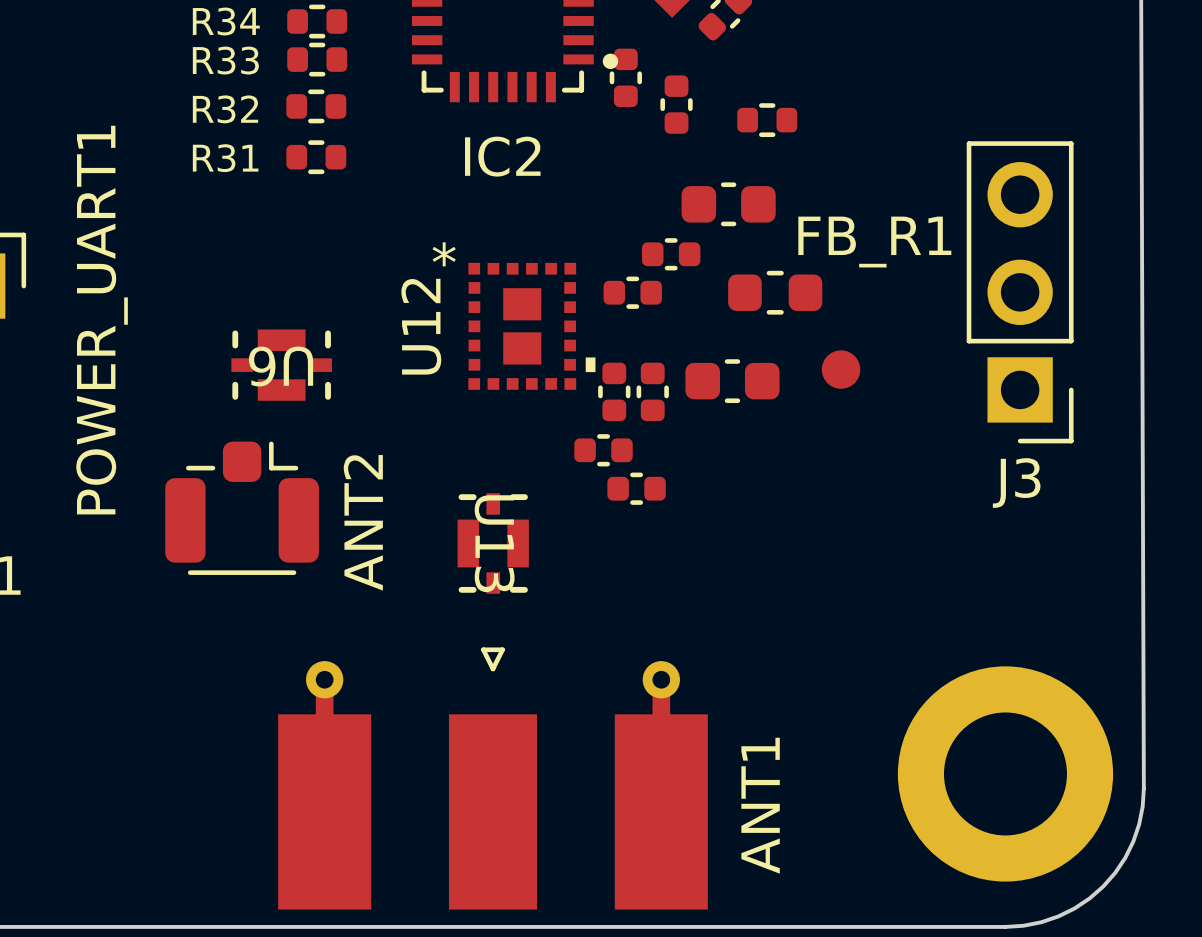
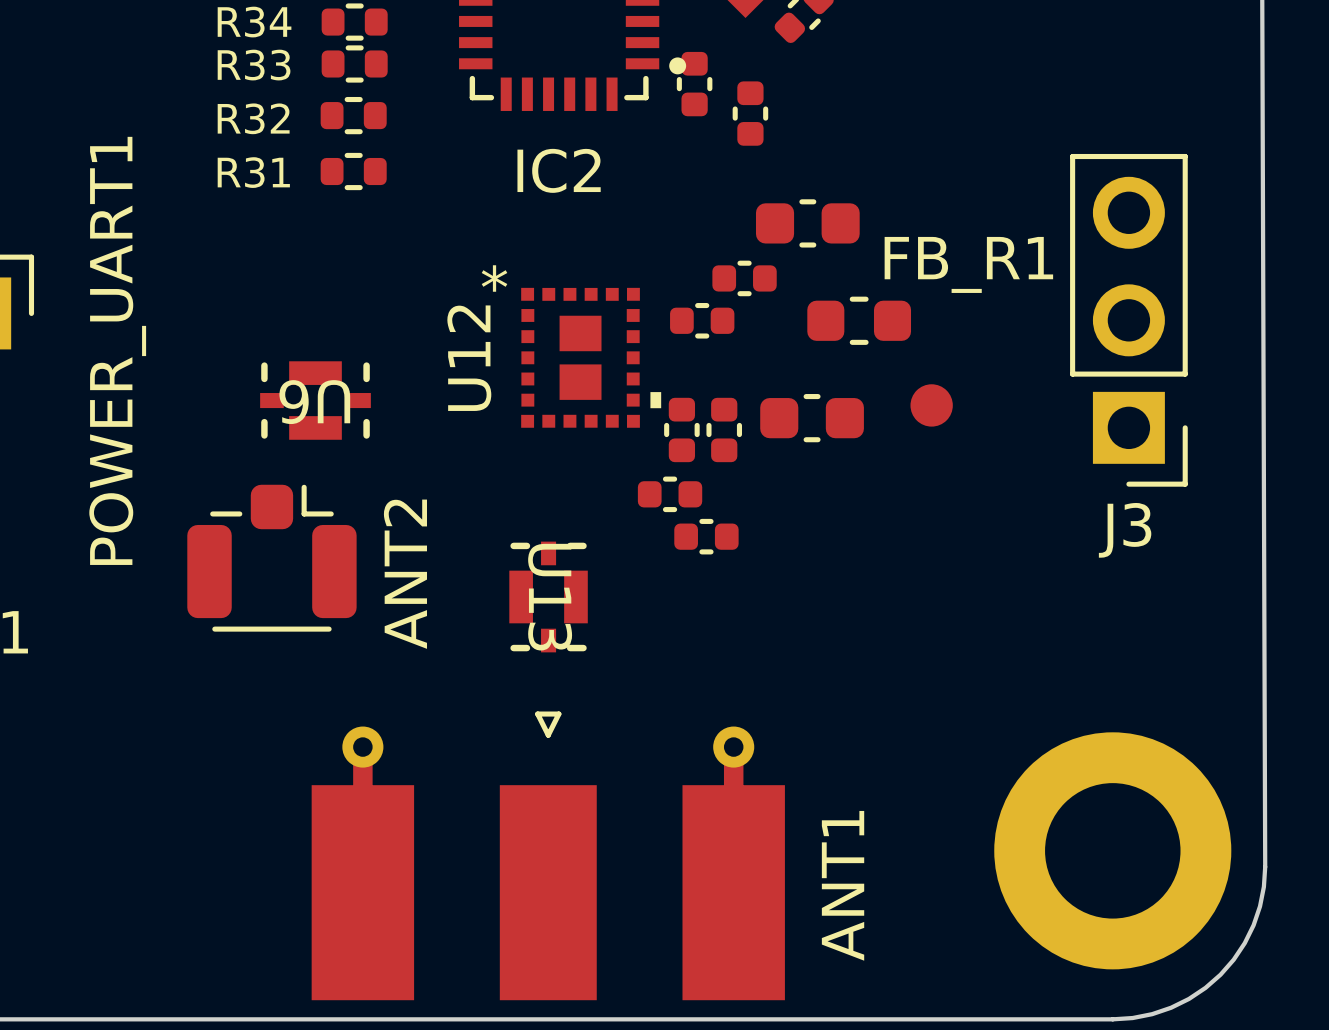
part: (767, 120) -> none

